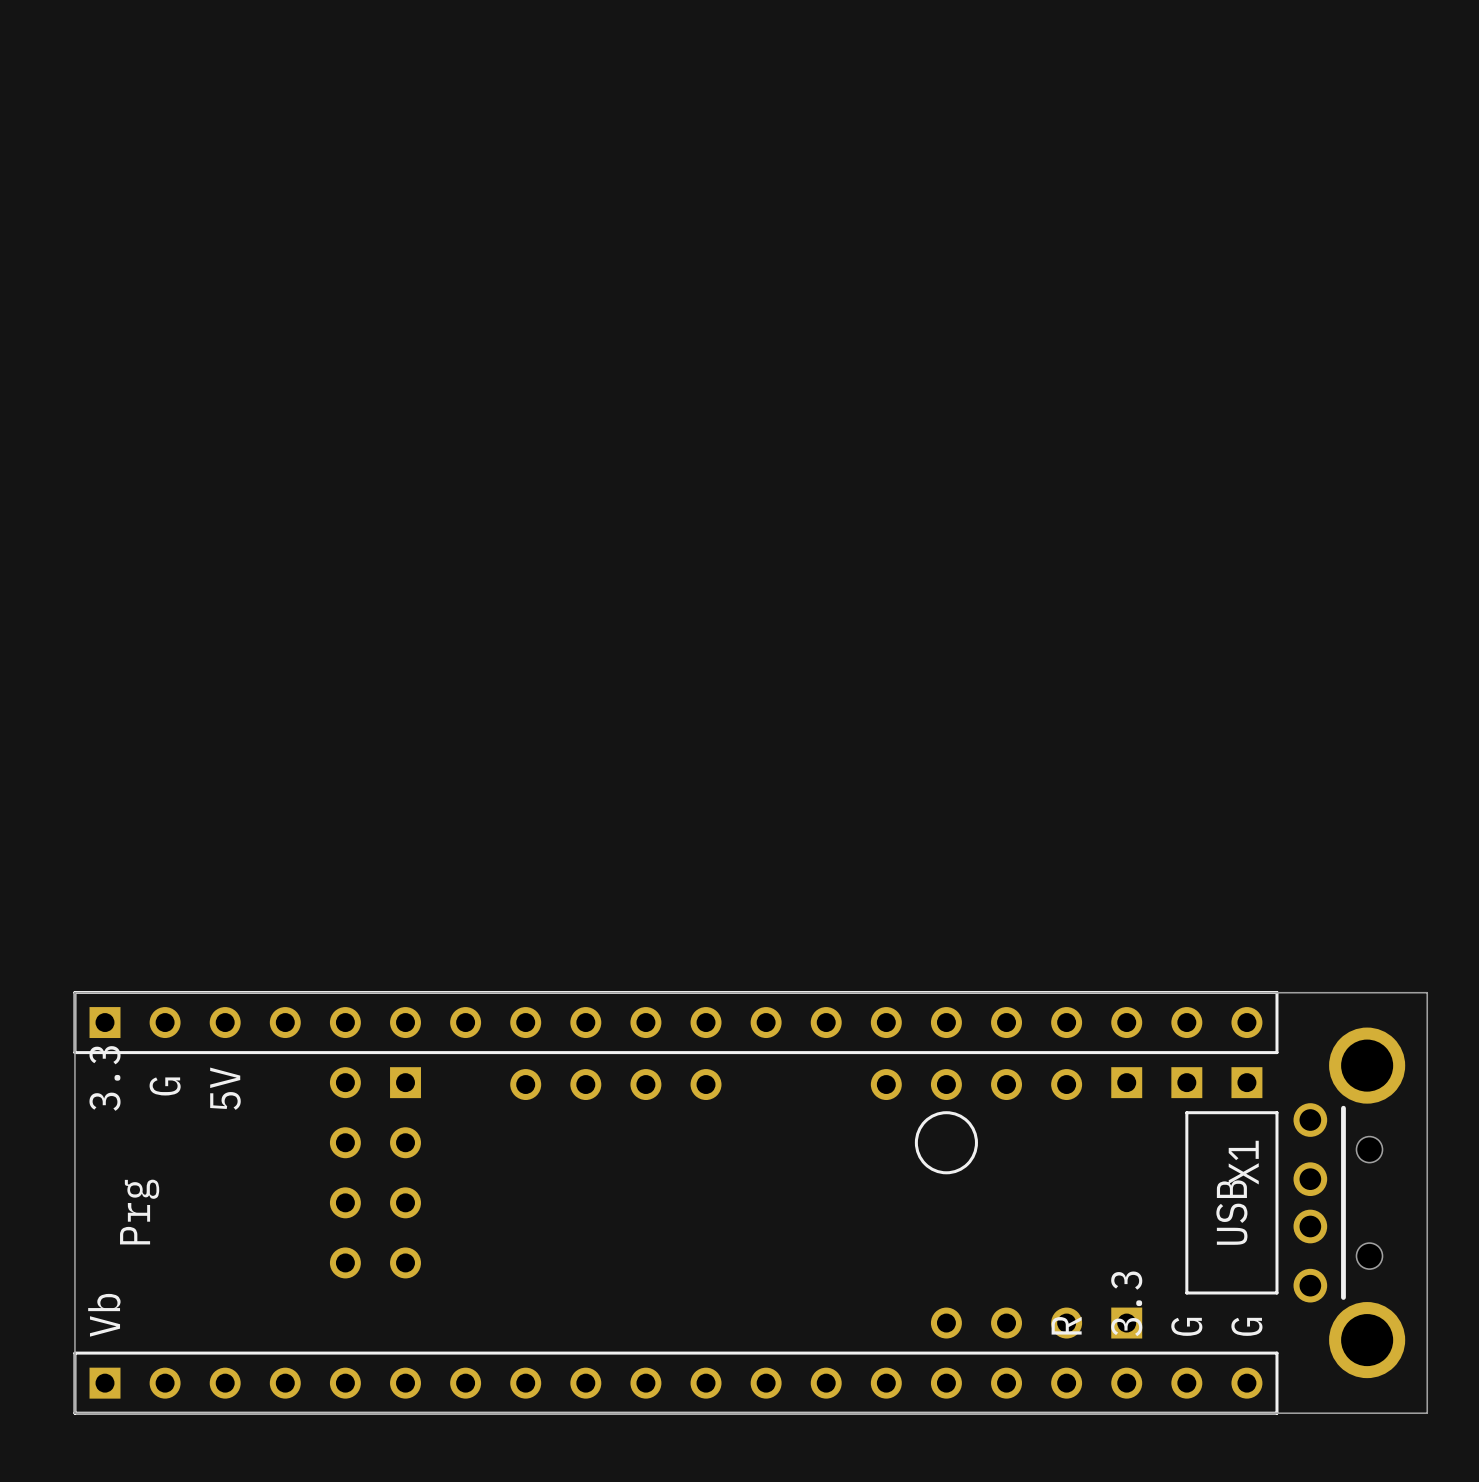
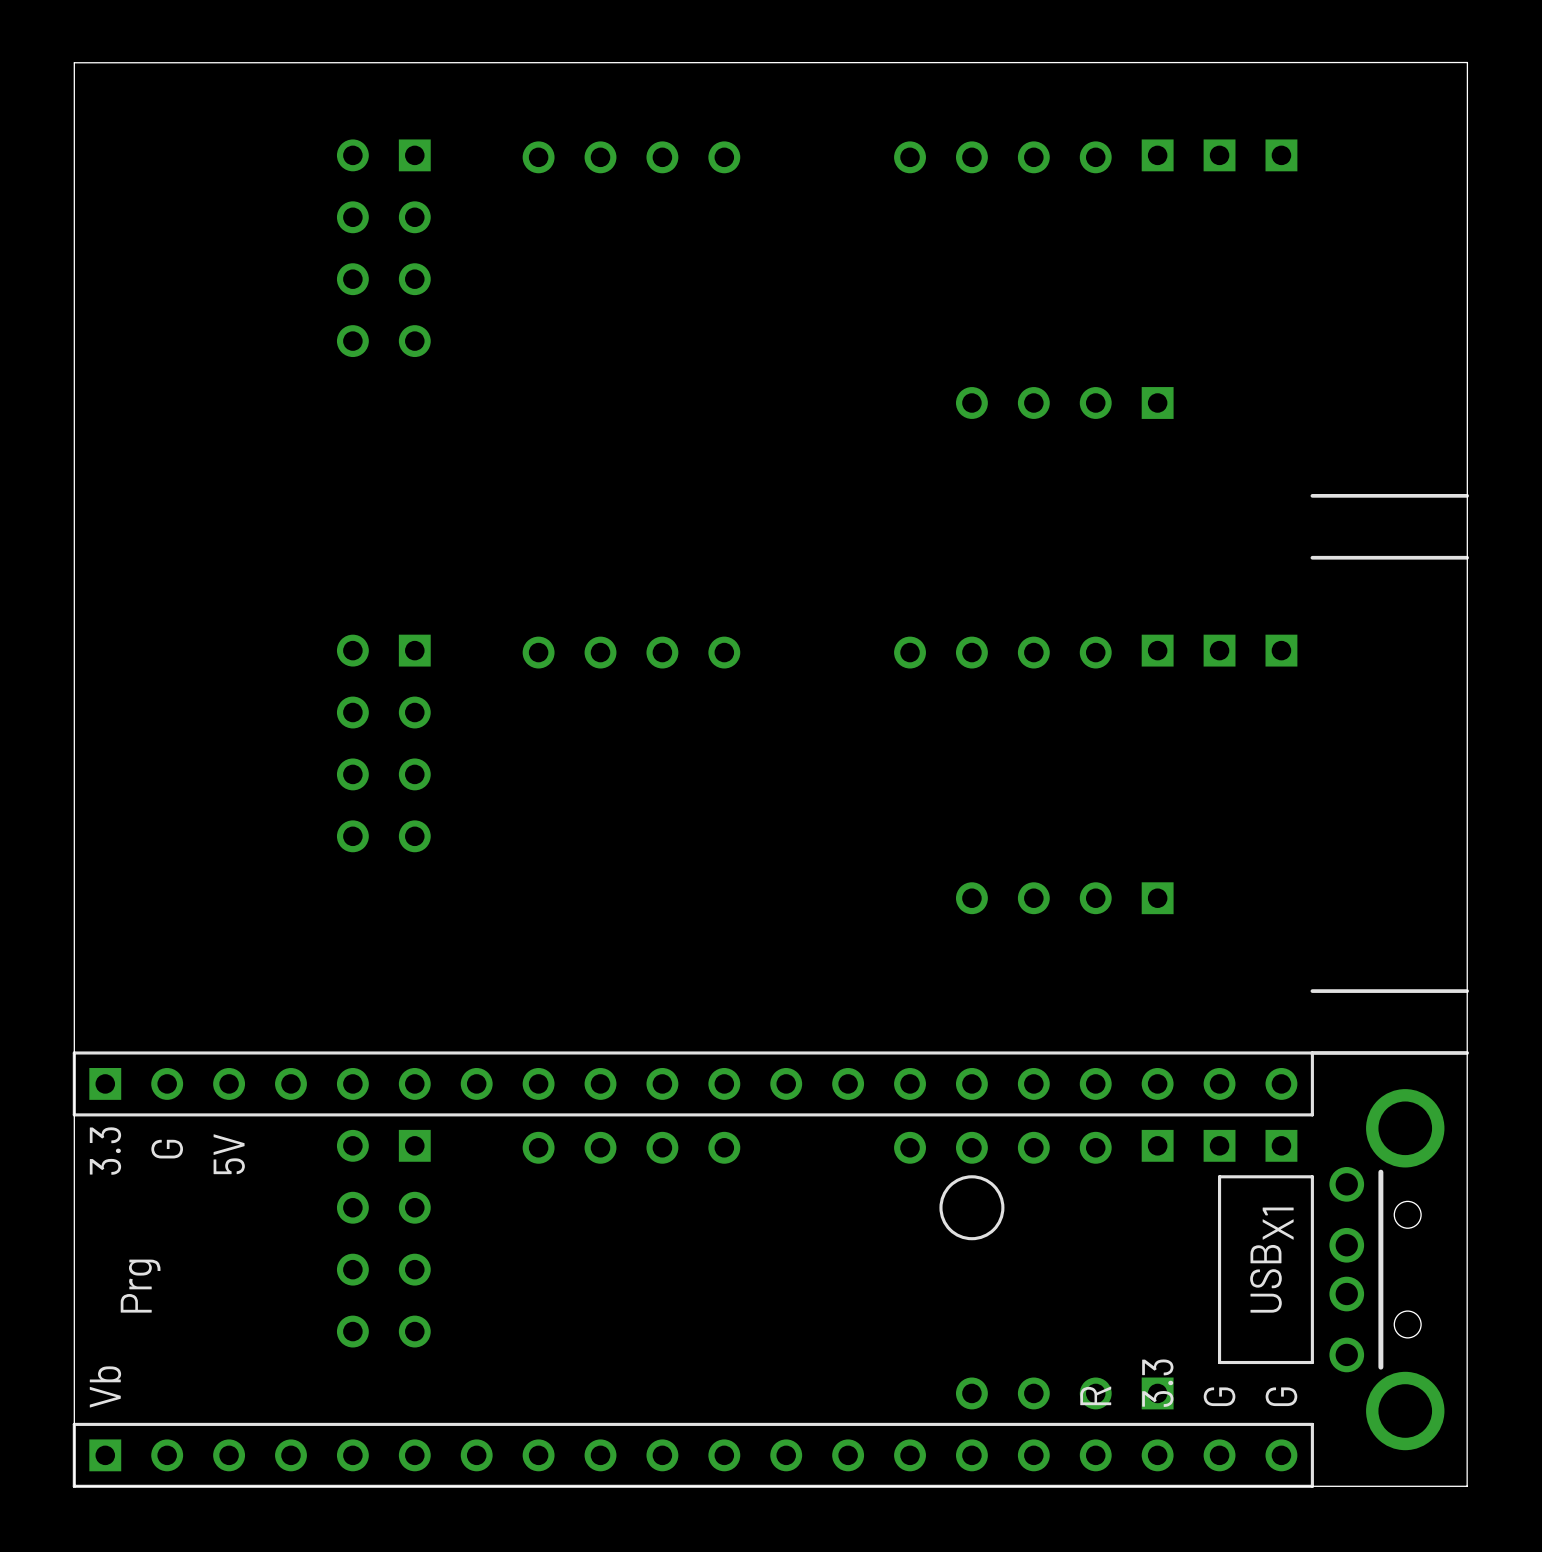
part: none -> (1219, 155)
part: none -> (631, 157)
part: none -> (1002, 157)
part: none -> (383, 248)
part: none -> (1064, 402)
line: none -> (1312, 495) (1467, 495)
line: none -> (1312, 557) (1467, 557)
part: none -> (1219, 650)
part: none -> (631, 652)
part: none -> (1002, 652)
part: none -> (383, 743)
part: none -> (1064, 898)
line: none -> (1312, 991) (1467, 991)
board edge: (74, 992) (1427, 992) (1427, 1413) -> (74, 1053) (74, 62) (1467, 62) (1467, 1486)
line: none -> (1312, 1052) (1467, 1052)

